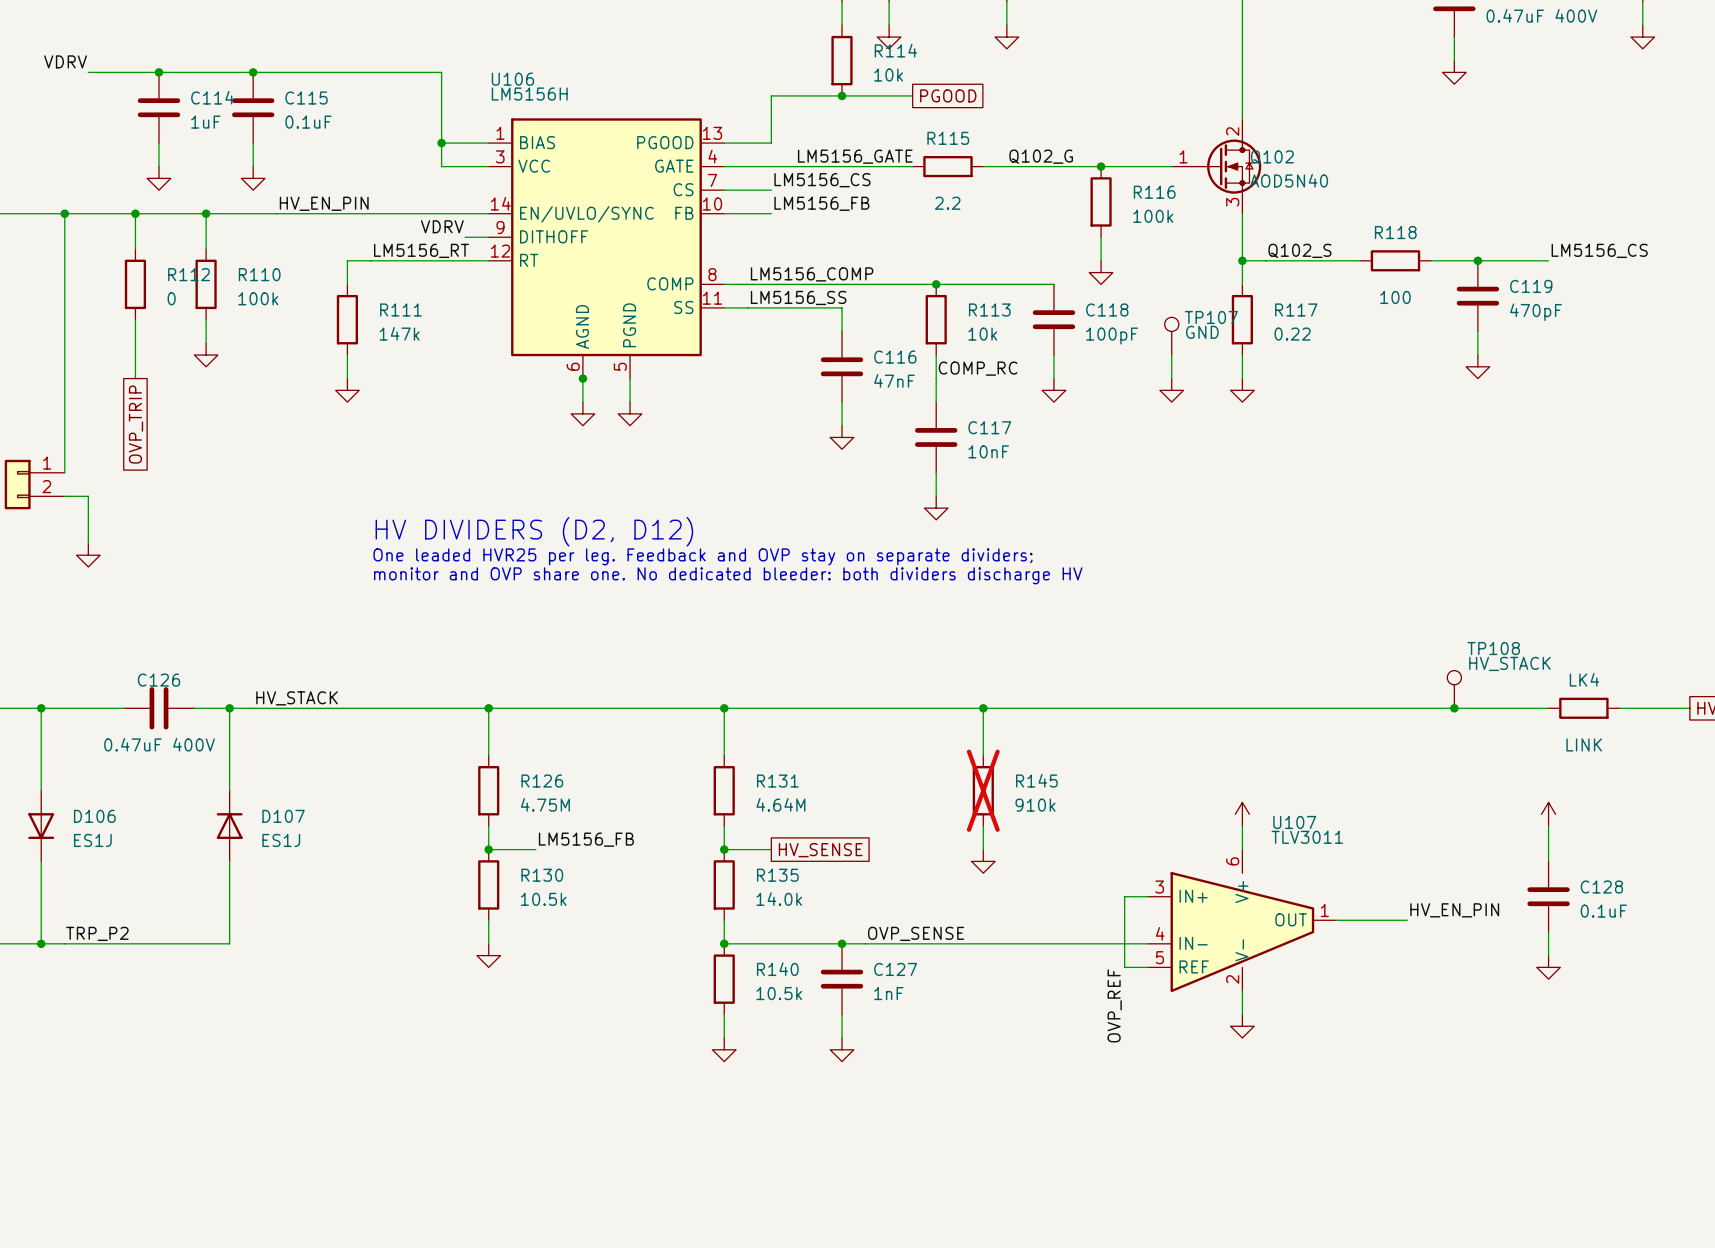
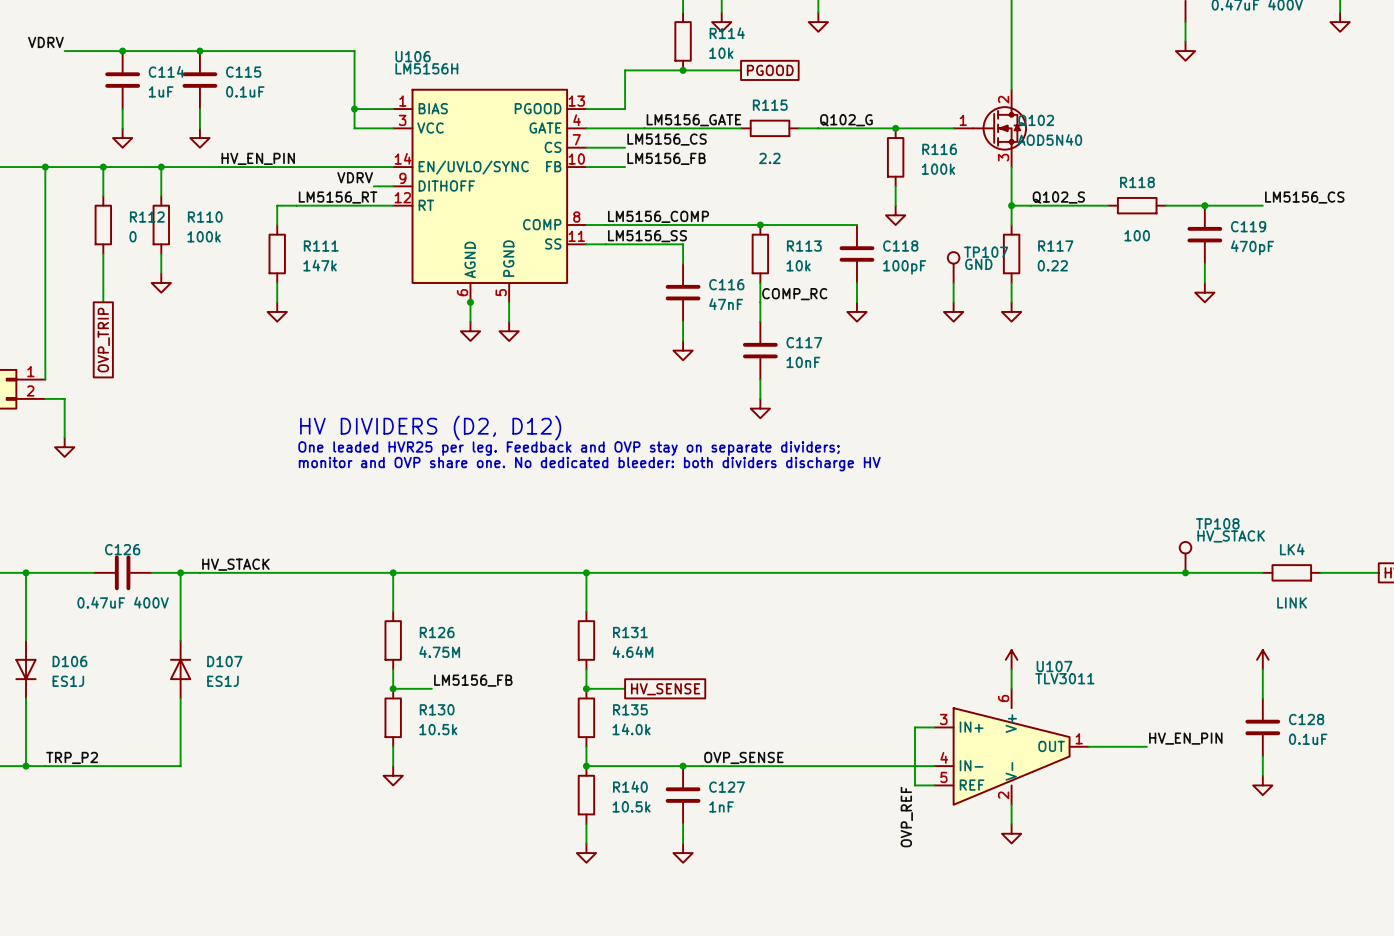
wire: (983, 708) (983, 755) -> none
junction: (983, 708) -> none
R145: 910k (983, 790) -> none
wire: (983, 826) (983, 849) -> none
power symbol: (983, 861) -> none

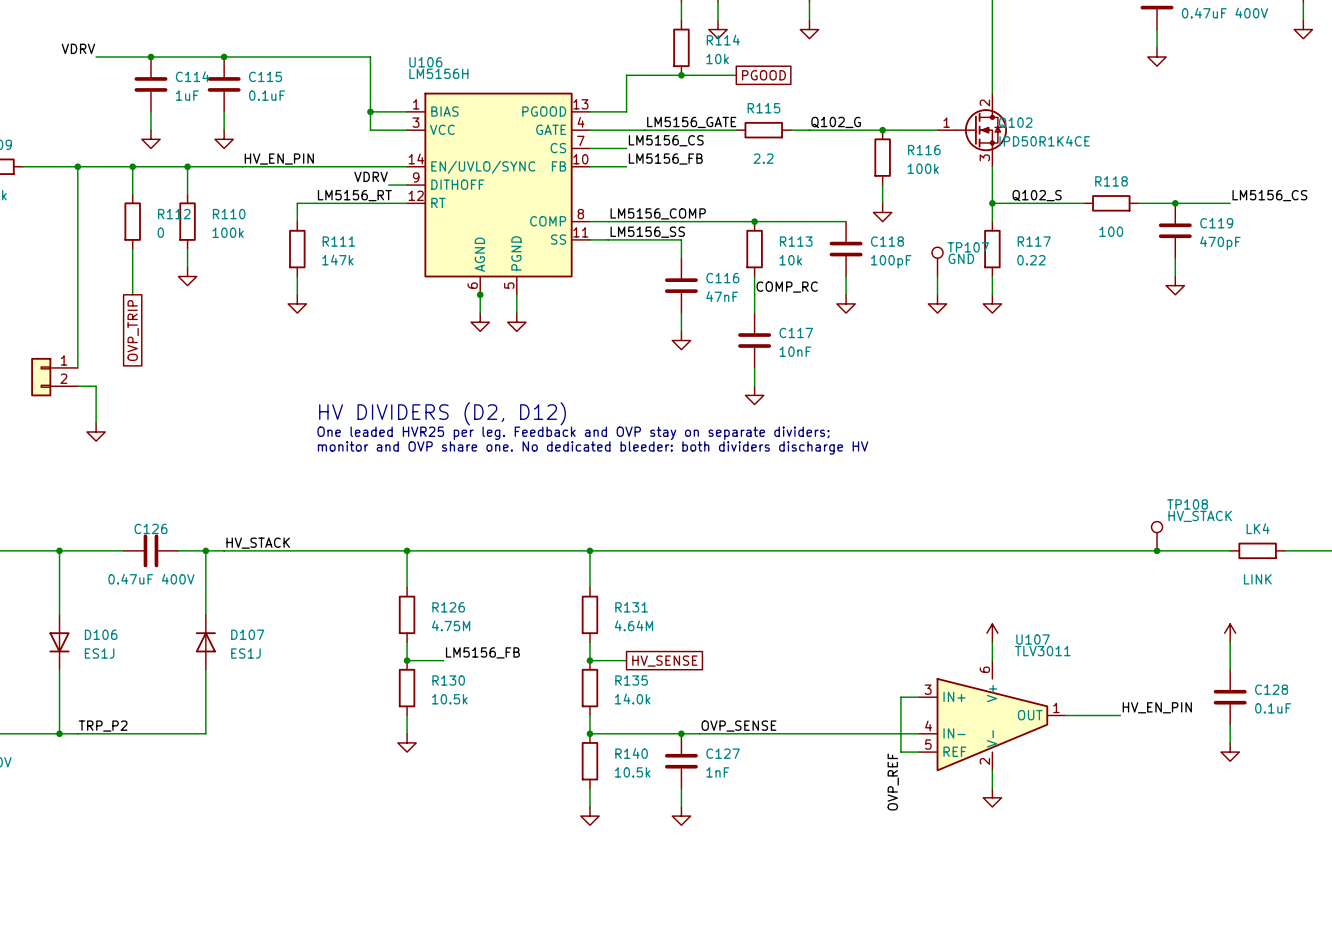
Q102 value: AOD5N40 (1049, 139) -> IPD50R1K4CE (1044, 141)

